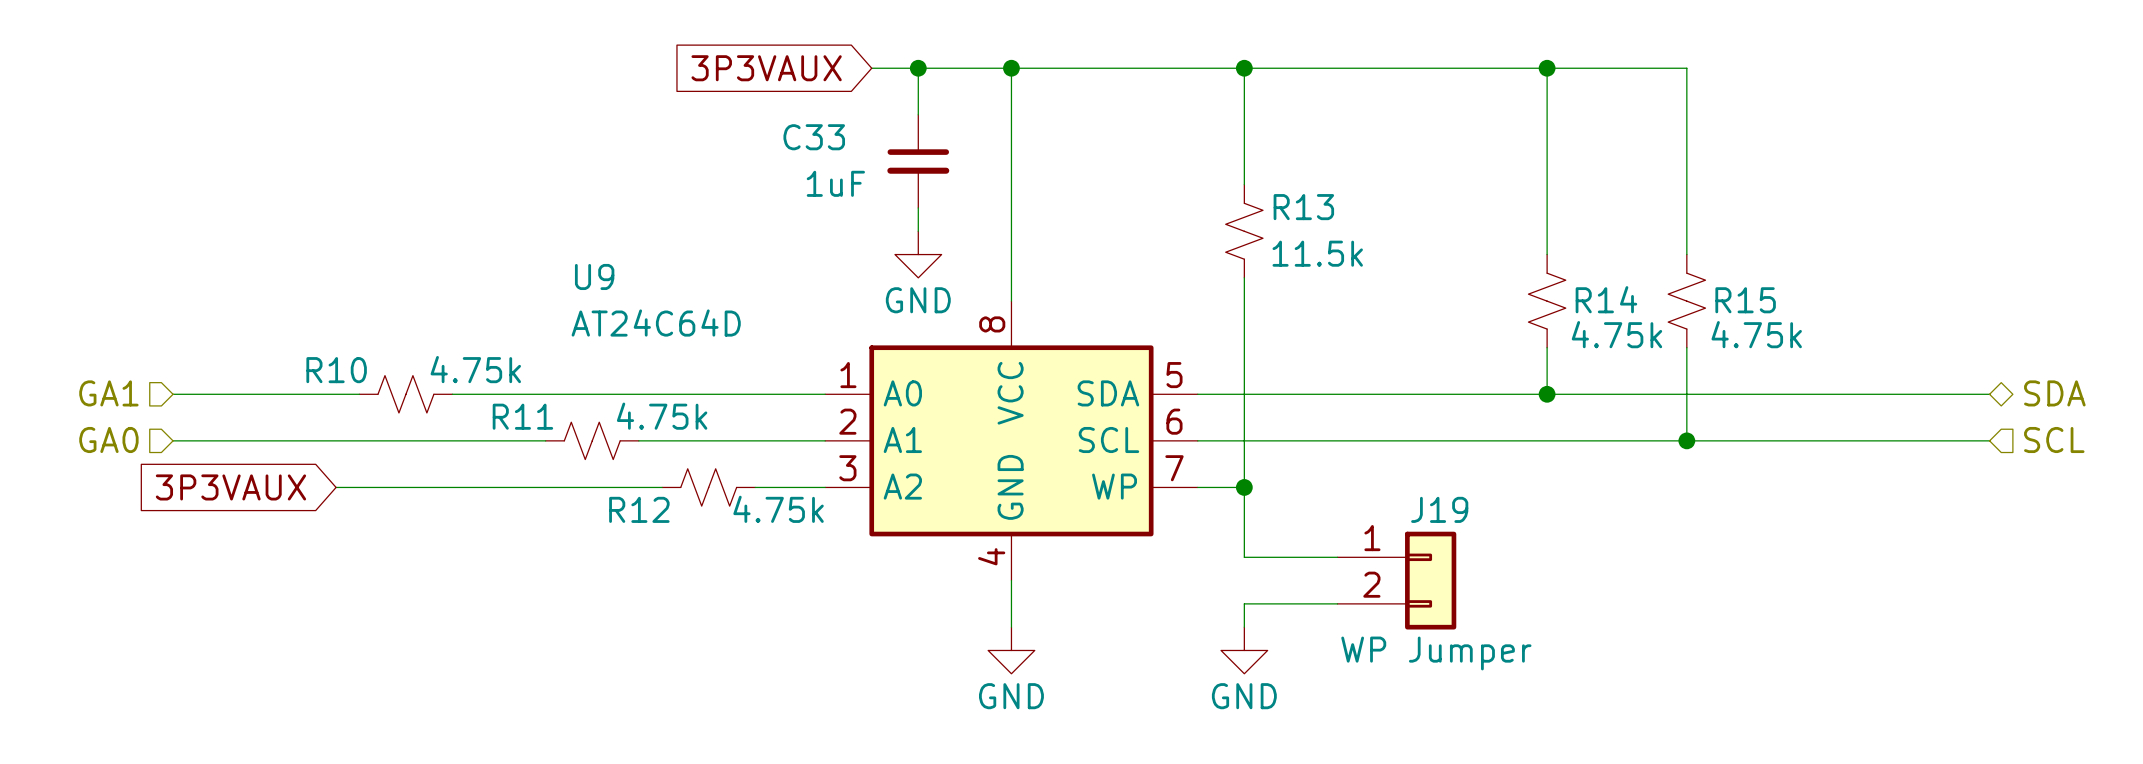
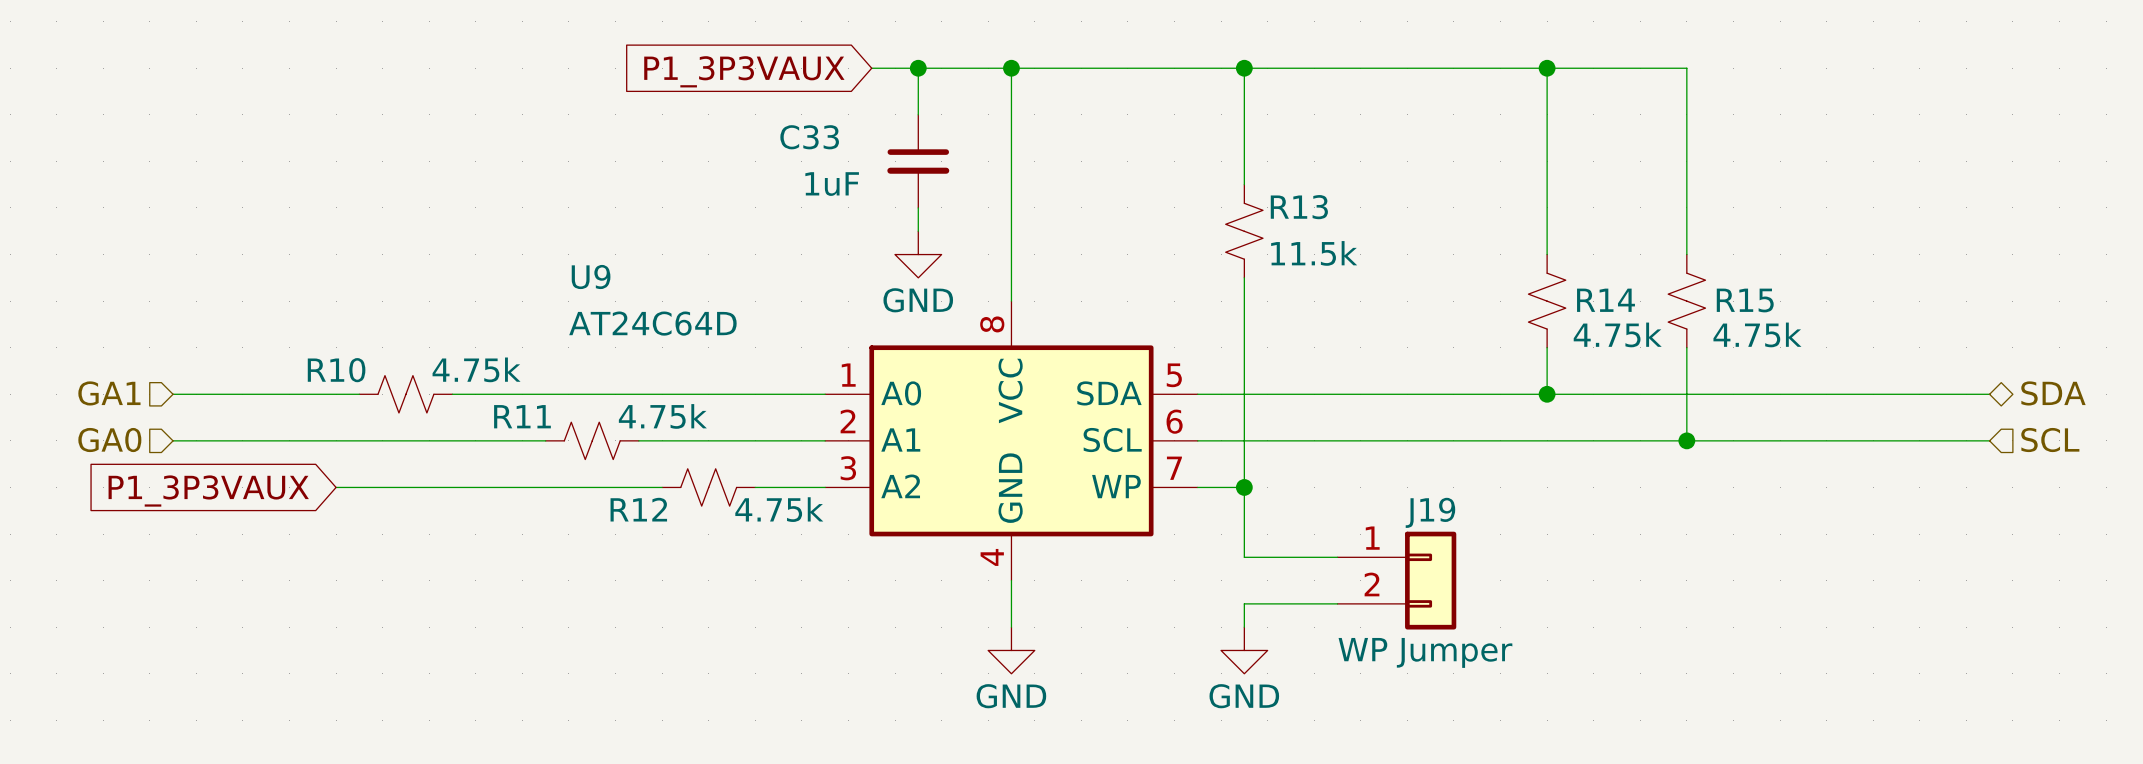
global label: 3P3VAUX (766, 68) -> P1_3P3VAUX (744, 71)
global label: 3P3VAUX (230, 487) -> P1_3P3VAUX (208, 491)

